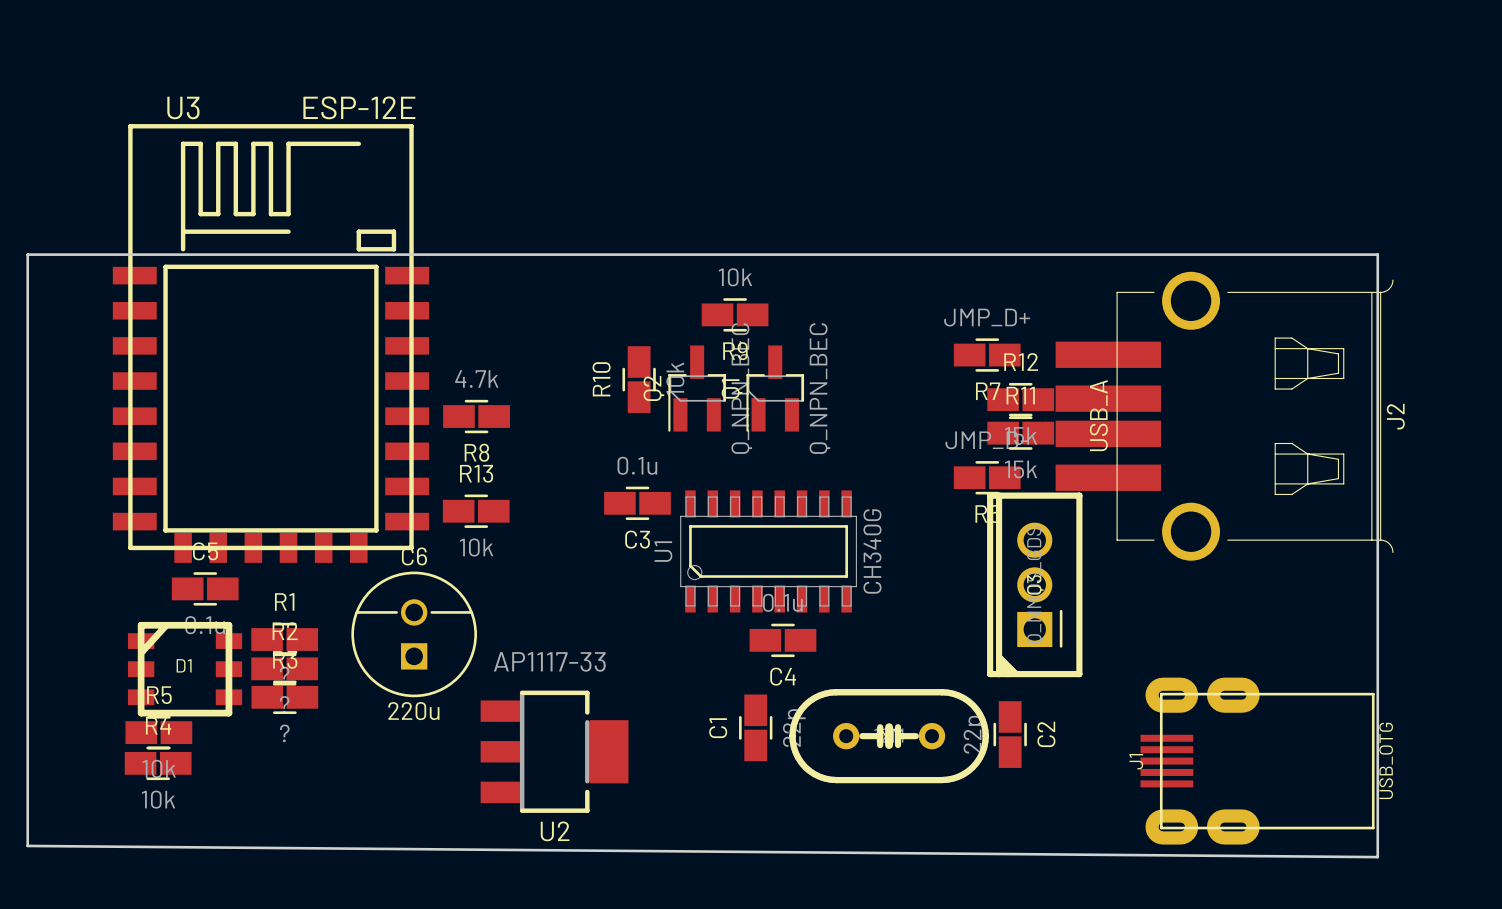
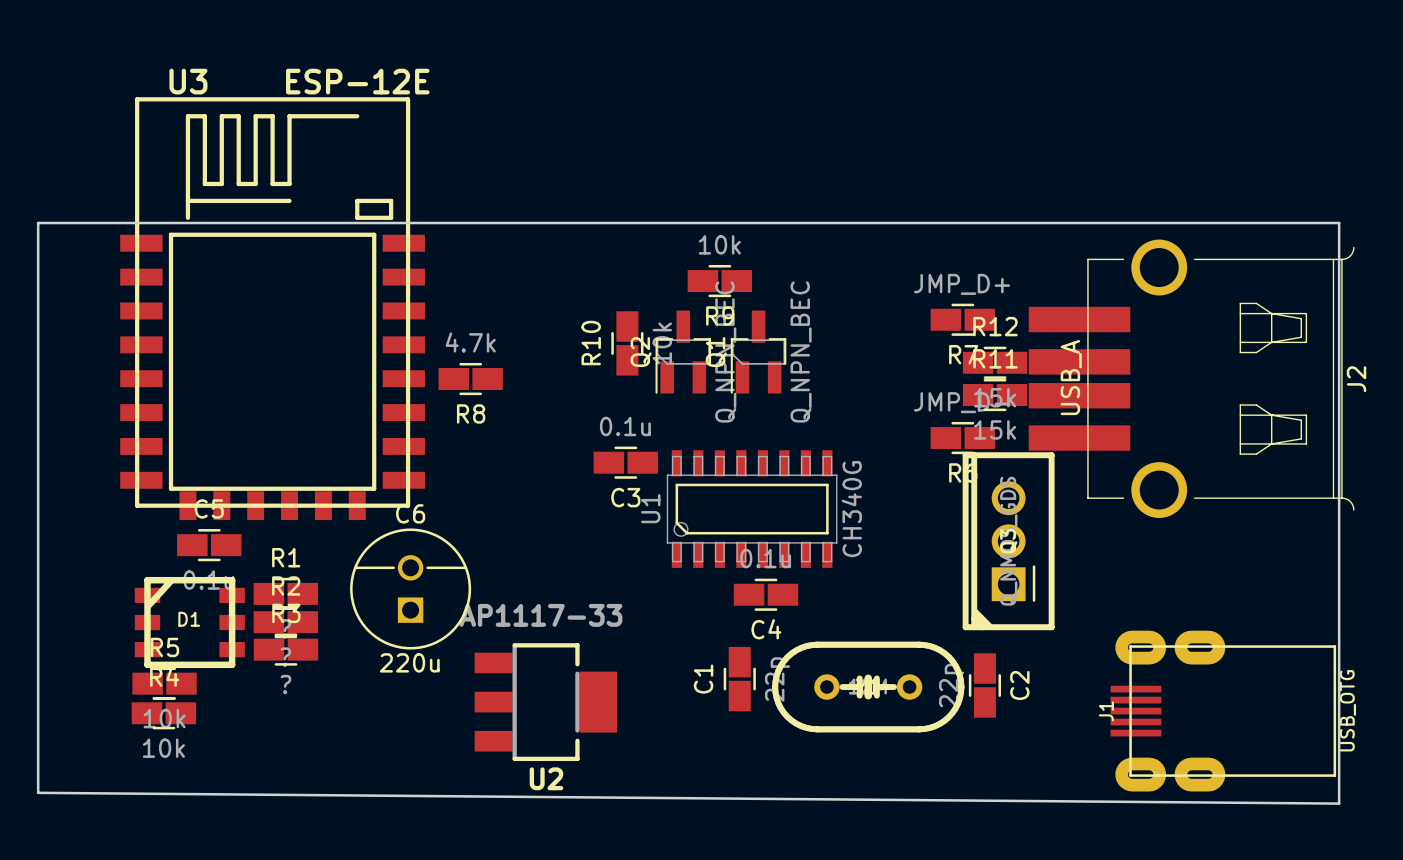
R13: 10k (476, 511) -> none

